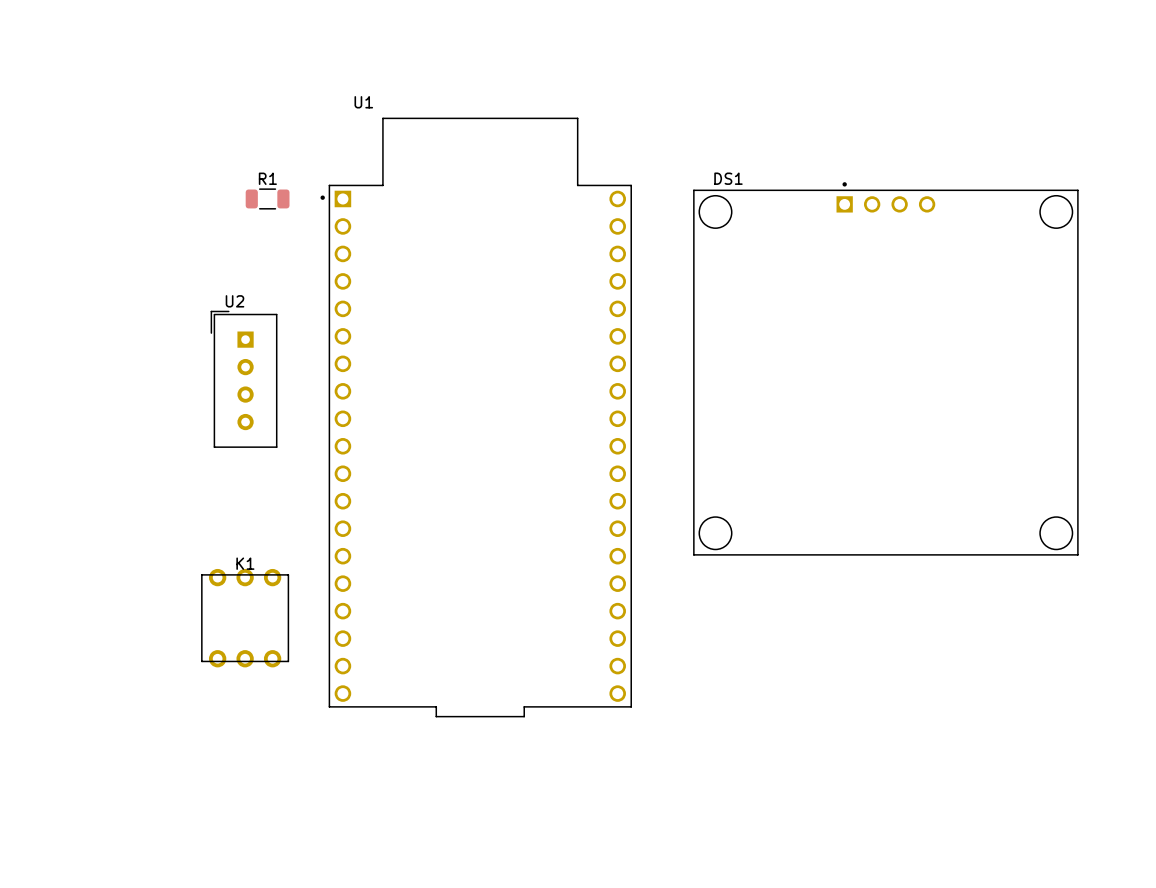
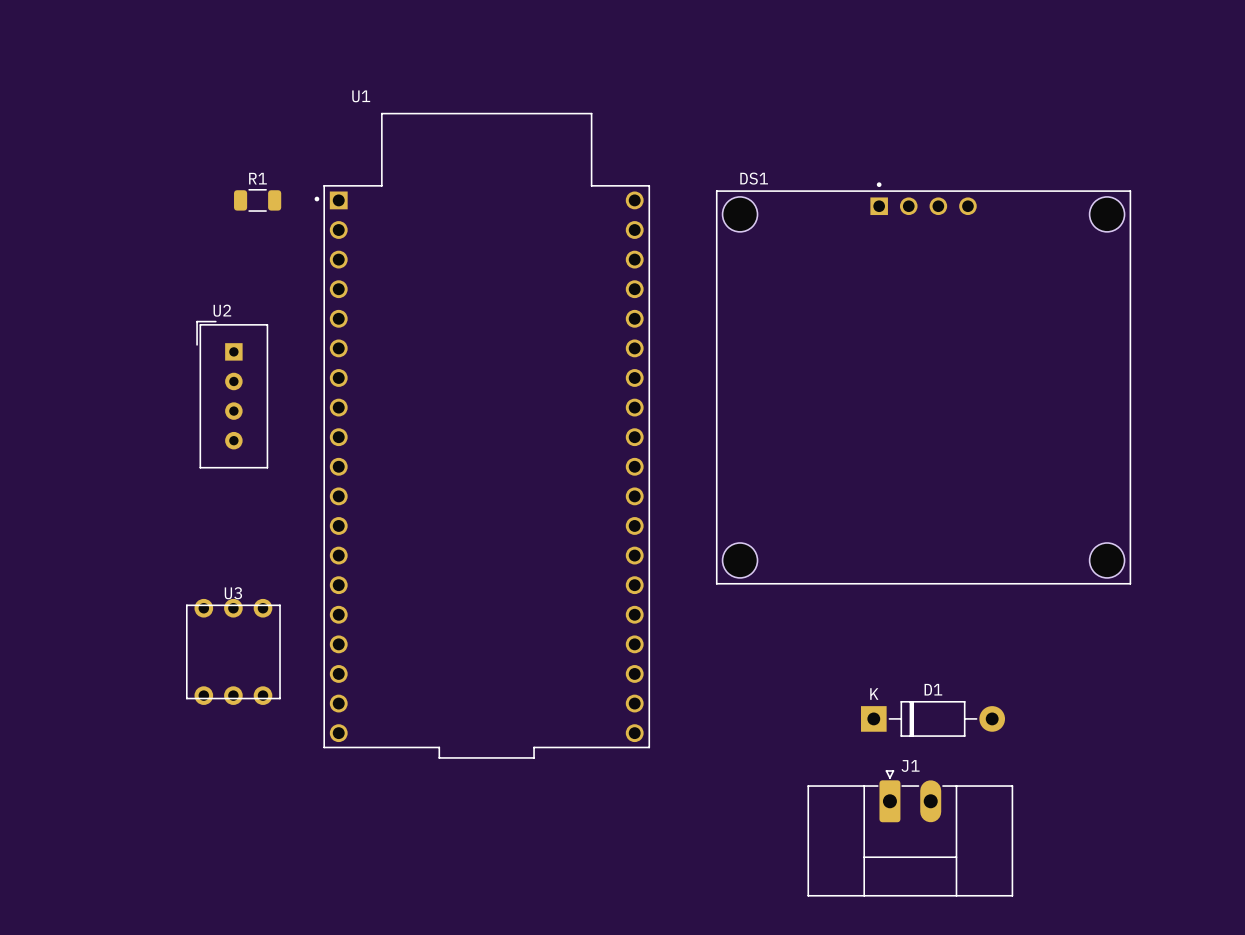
K1 name: K1 (245, 563) -> U3 (233, 593)
D1: none -> (933, 718)
J1: none -> (910, 833)

